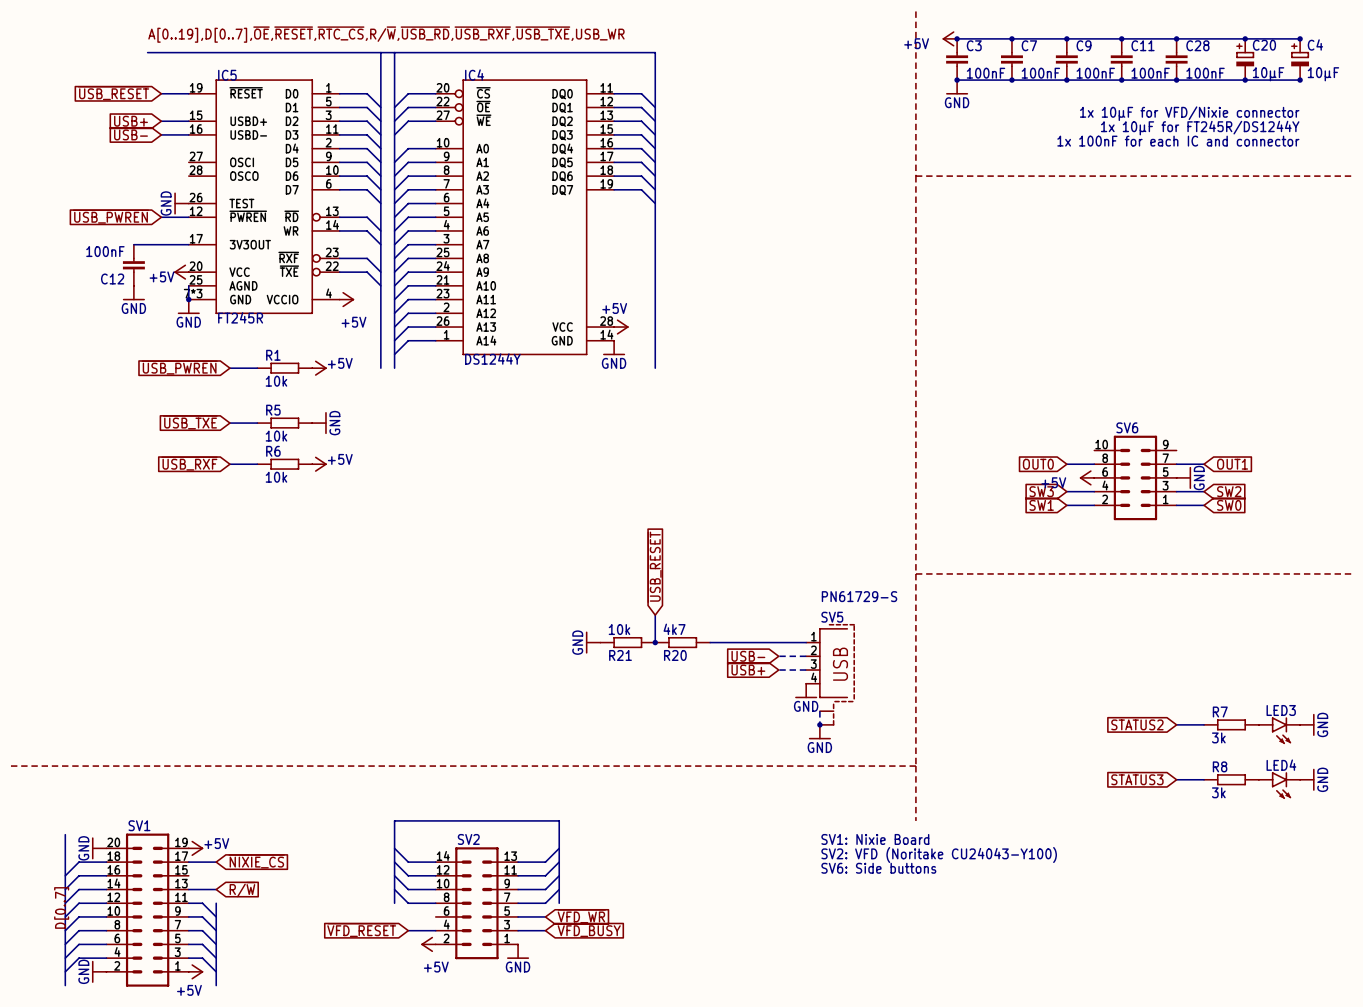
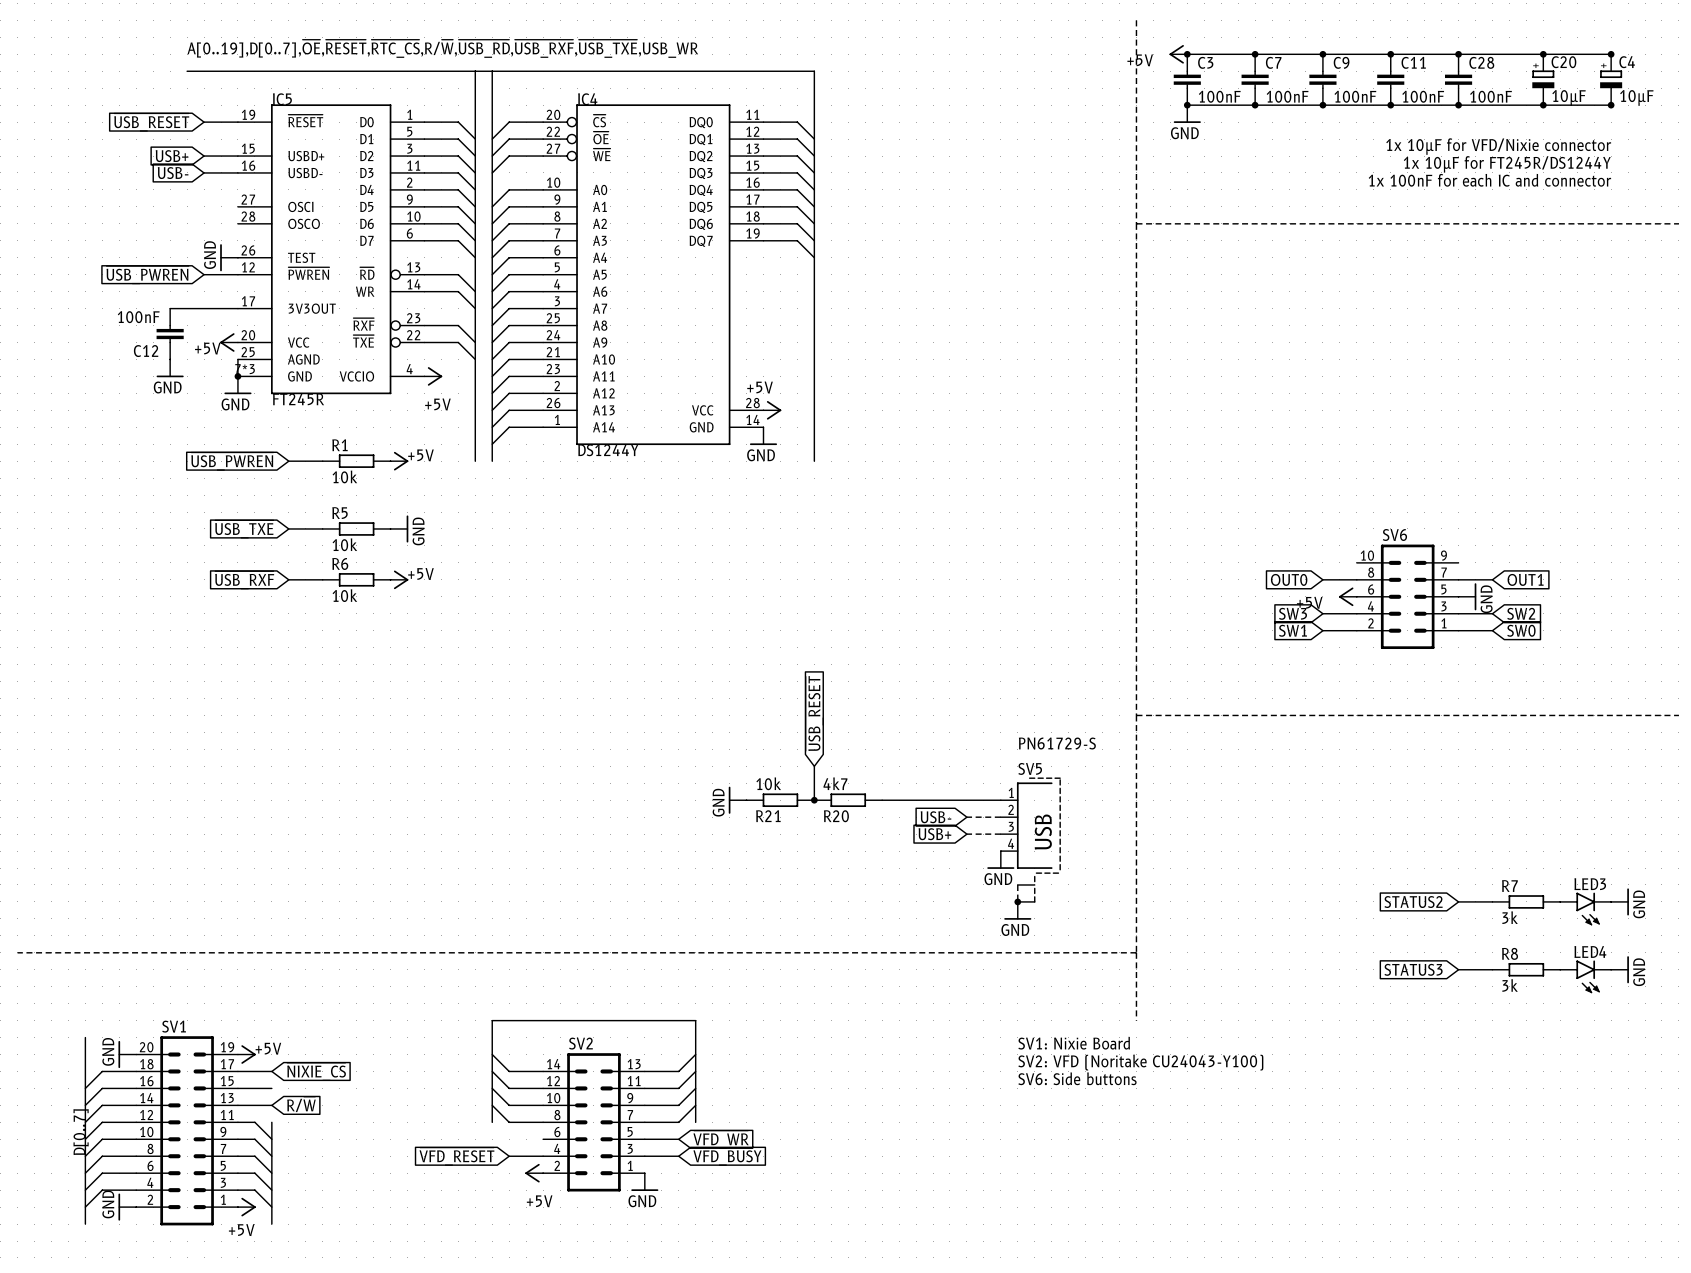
wire: none -> (237, 1088) (271, 1088)

